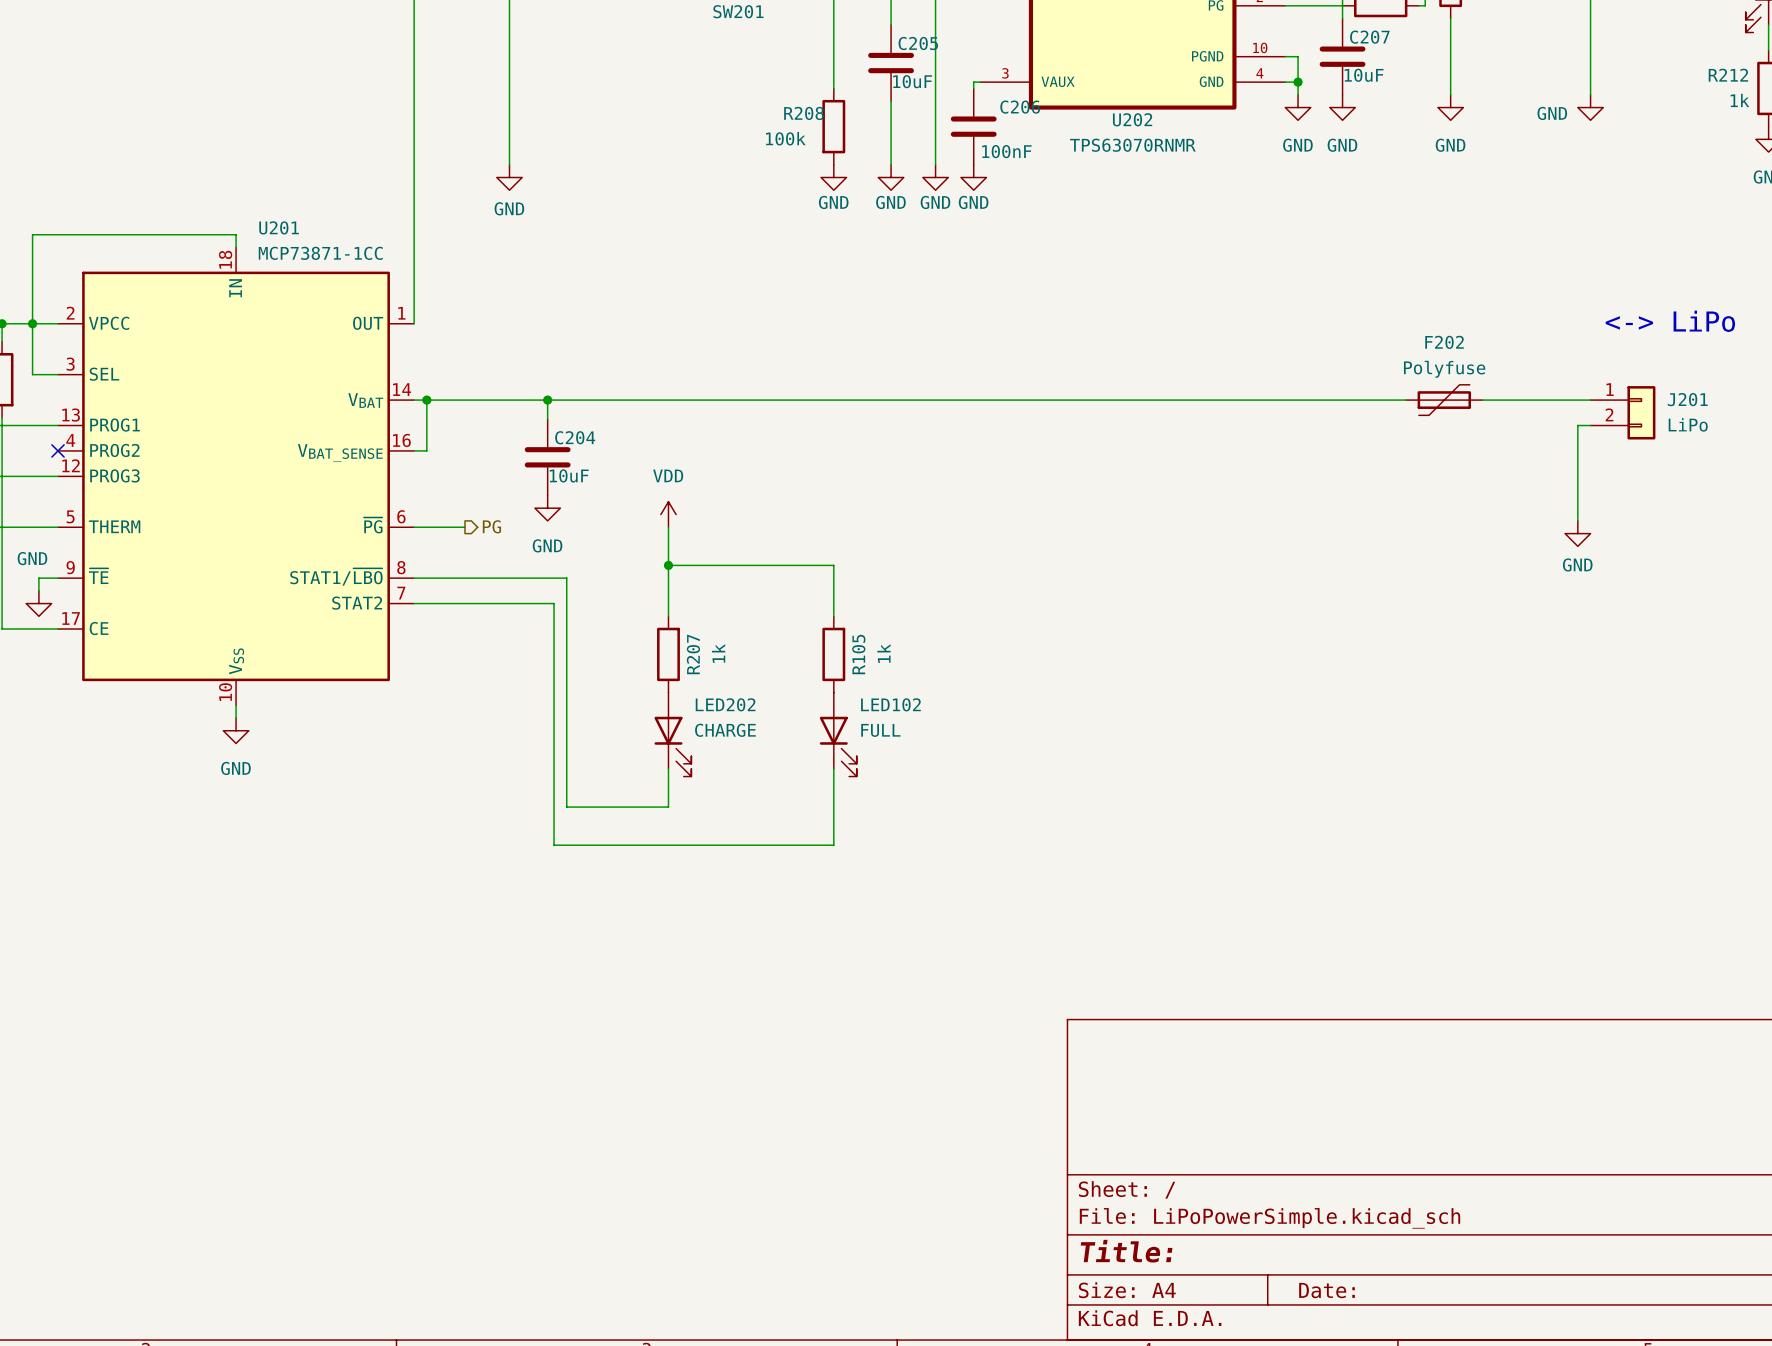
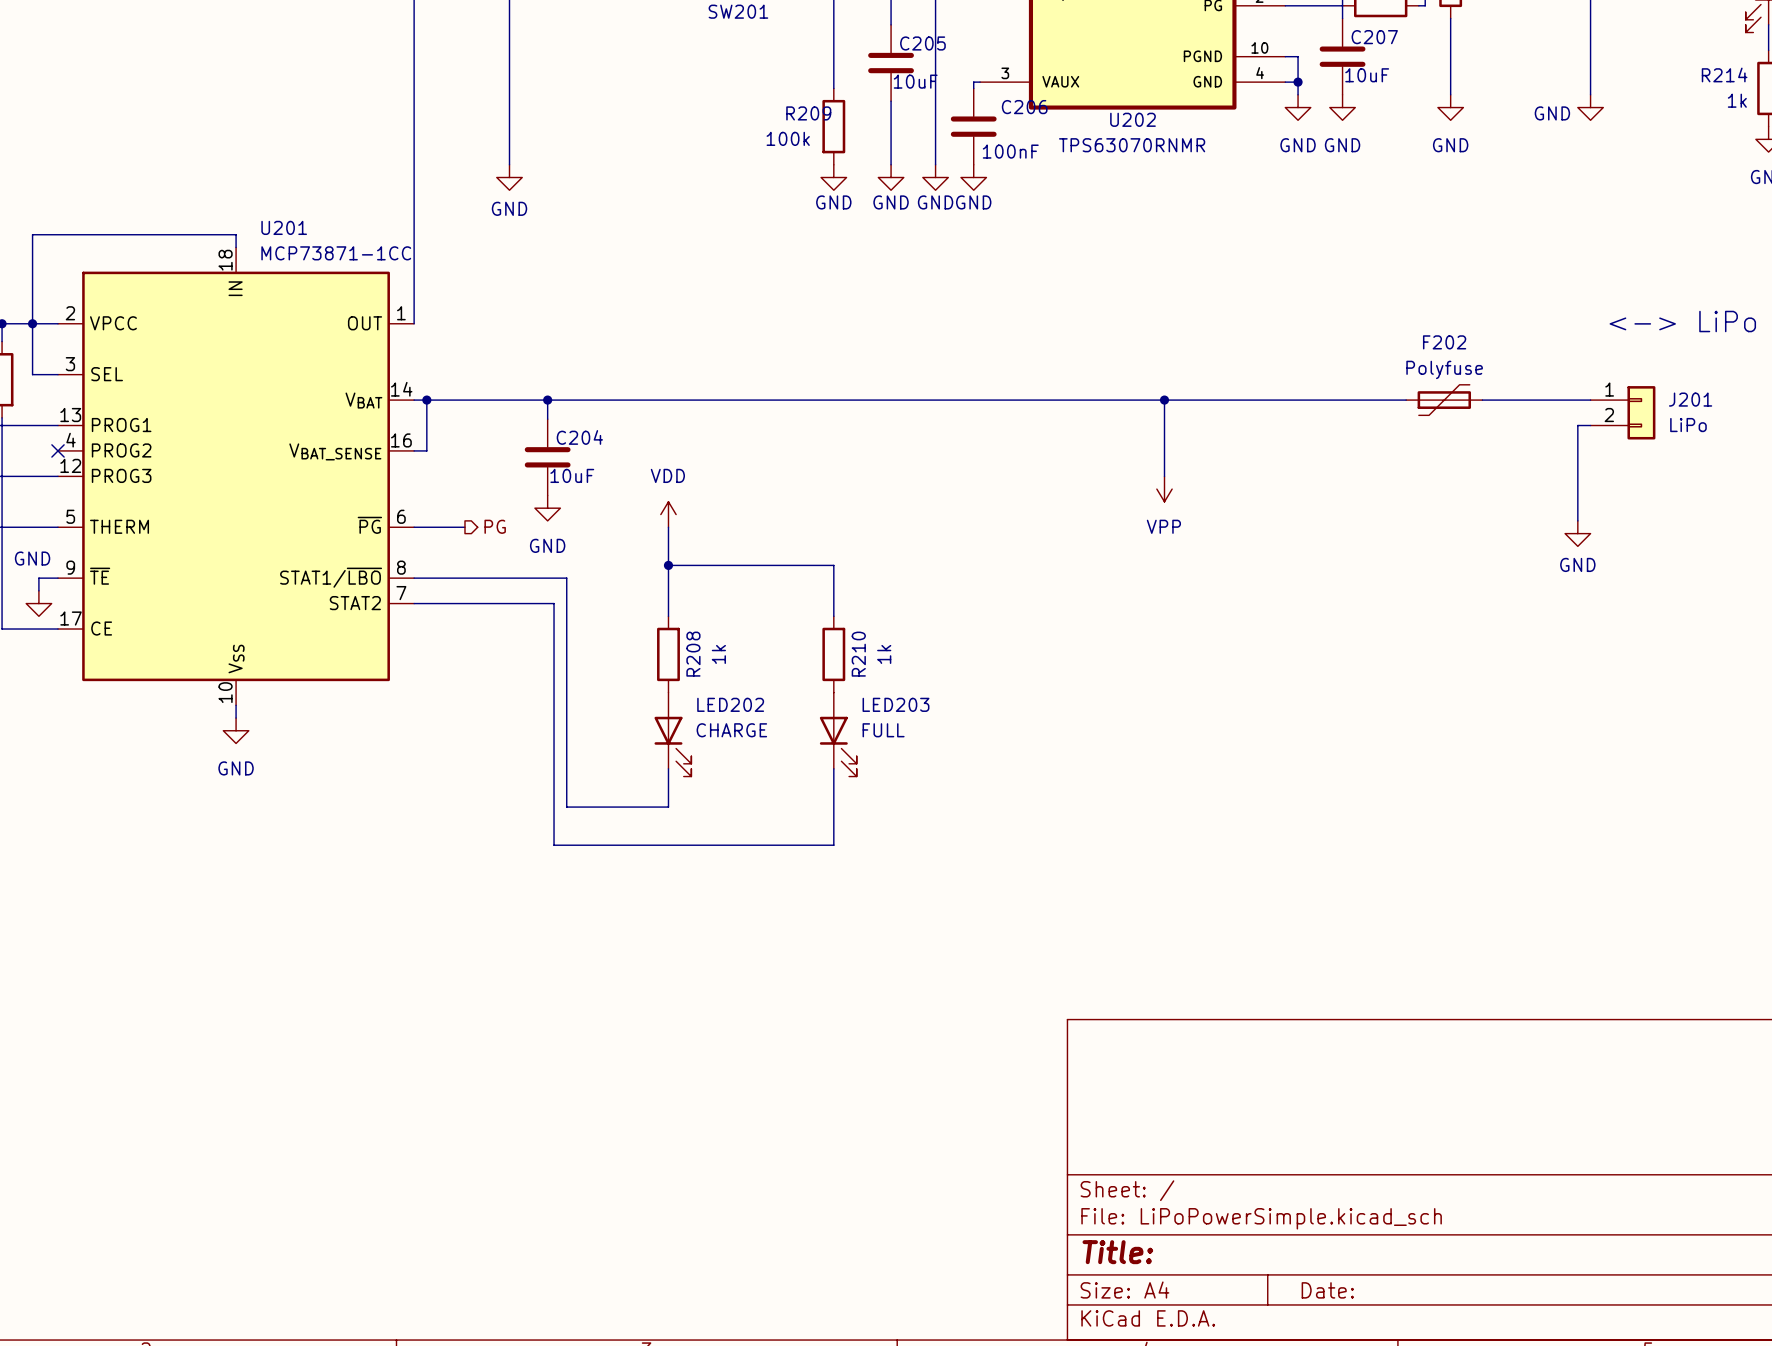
R212 name: R212 (1728, 75) -> R214 (1724, 74)
R208 name: R208 (804, 113) -> R209 (808, 113)
wire: none -> (1164, 400) (1164, 476)
junction: none -> (1164, 400)
power symbol: none -> VPP (1164, 489)
R207 name: R207 (693, 654) -> R208 (693, 654)
R105 name: R105 (858, 654) -> R210 (858, 654)
LED102 name: LED102 (890, 704) -> LED203 (895, 704)

